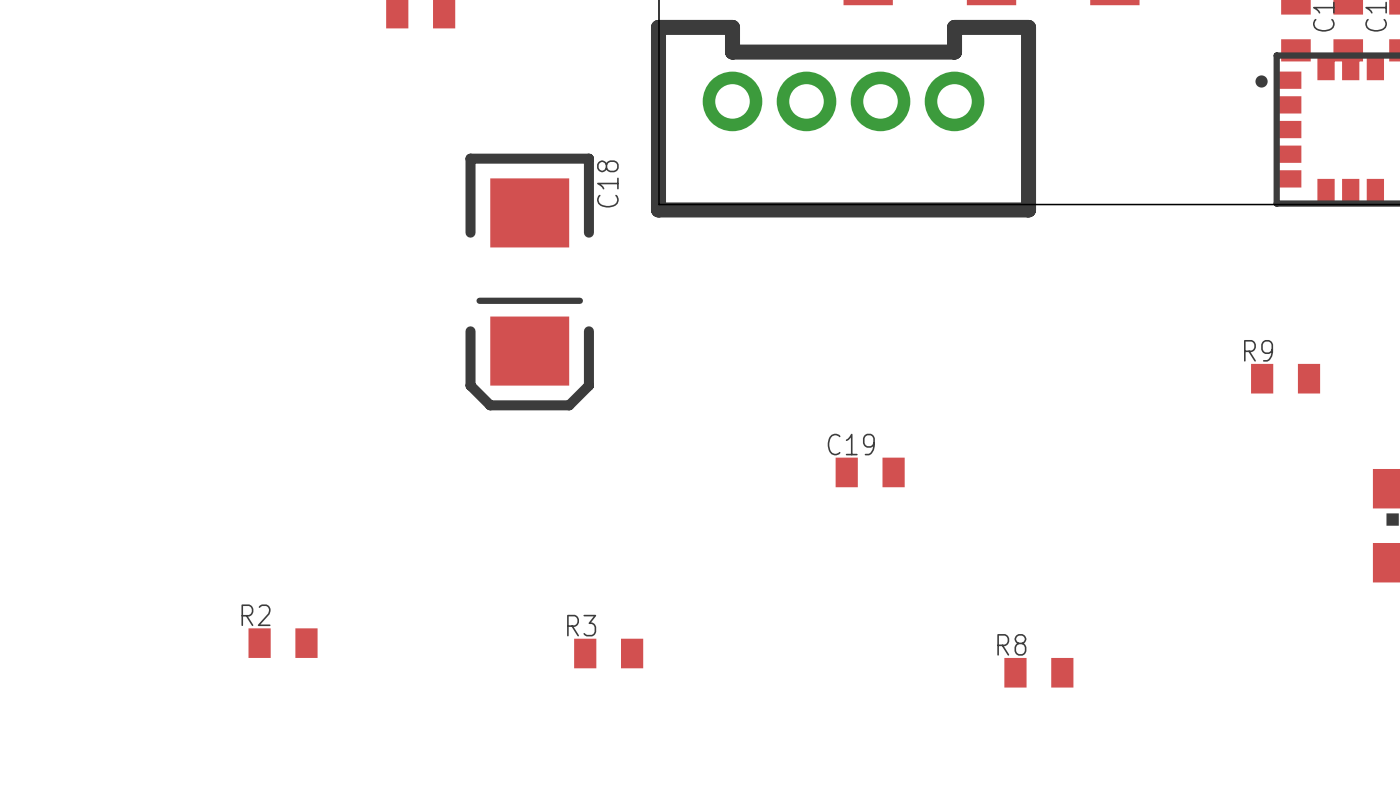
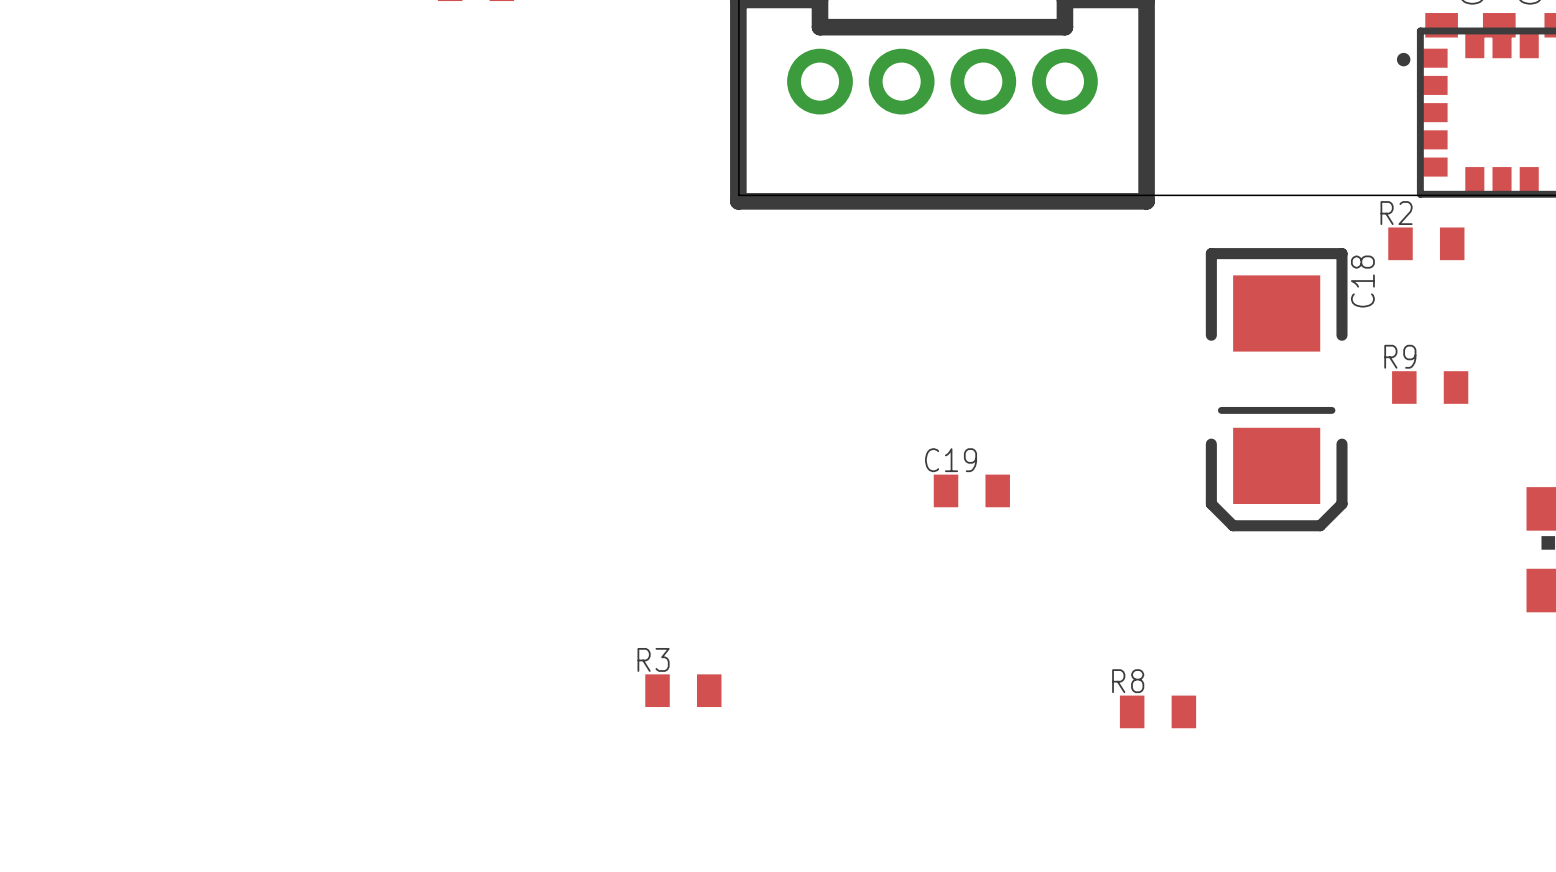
C18 position: (529, 282) -> (1276, 389)
R2 position: (283, 643) -> (1426, 243)

